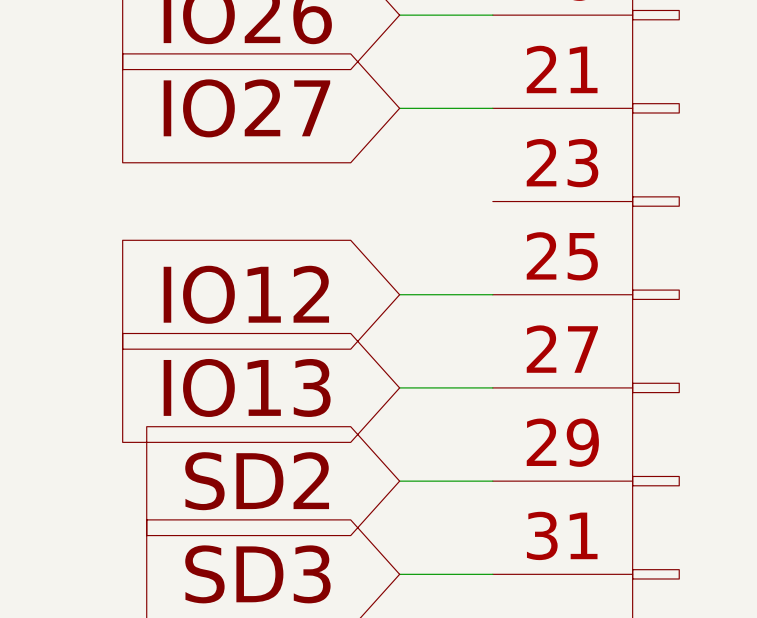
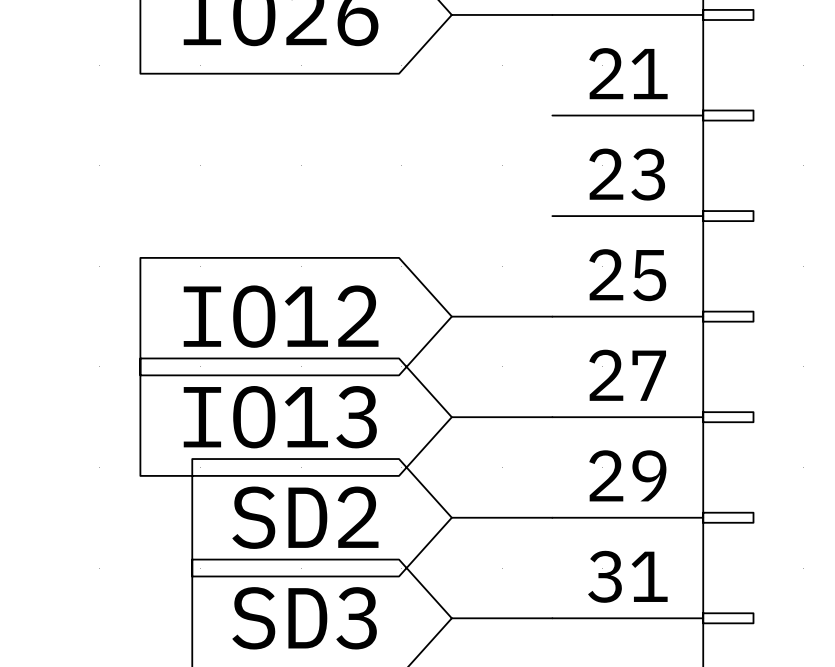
global label: IO27 (246, 108) -> none
wire: (399, 108) (492, 108) -> none

